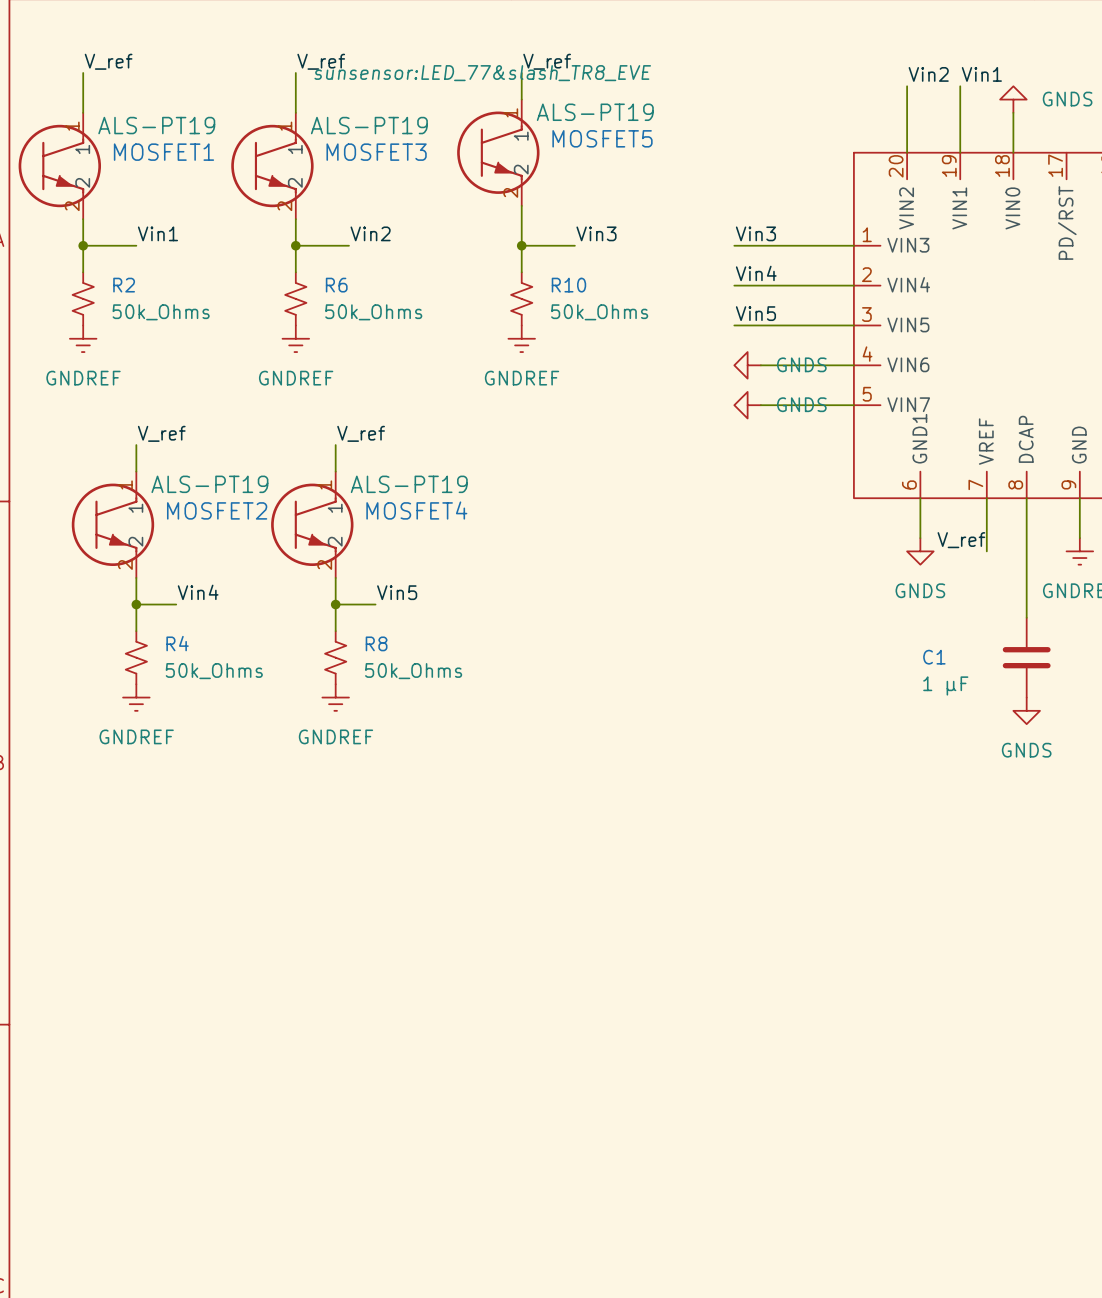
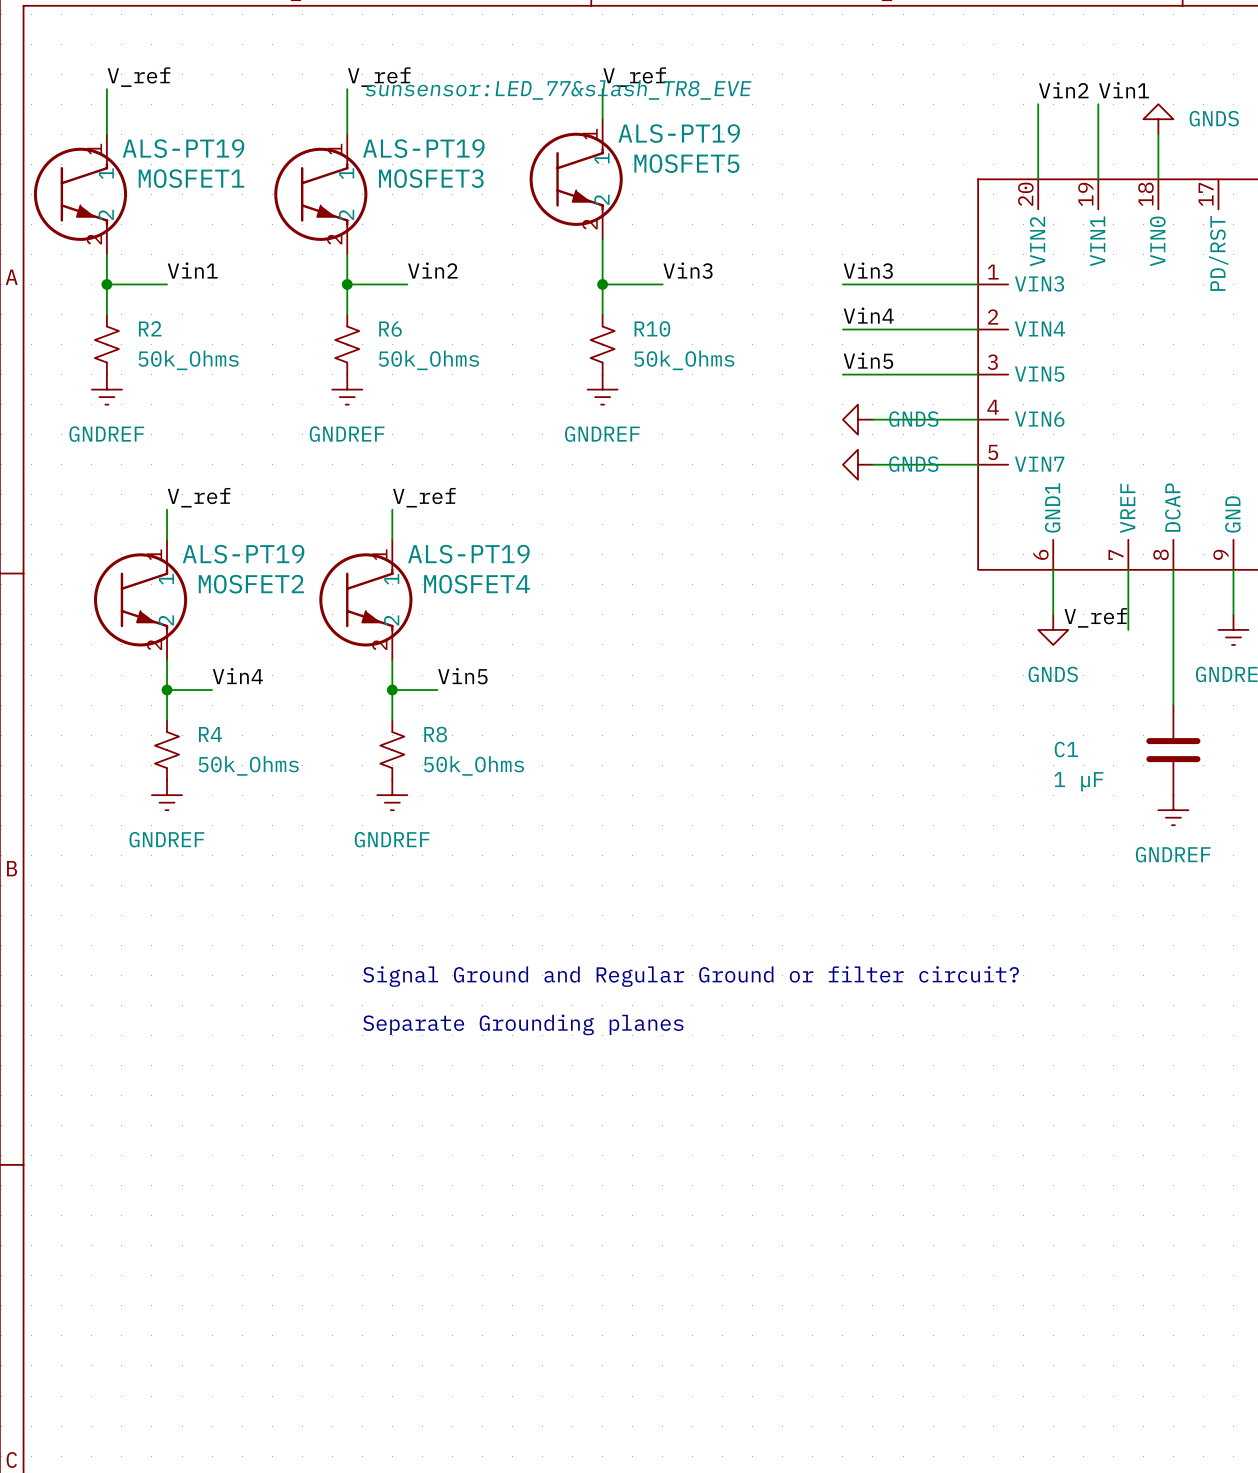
power symbol: GNDS (1026, 710) -> GNDREF (1173, 810)
text: none -> Signal Ground and Regular Ground or filter circuit? (691, 976)
text: none -> Separate Grounding planes (523, 1024)

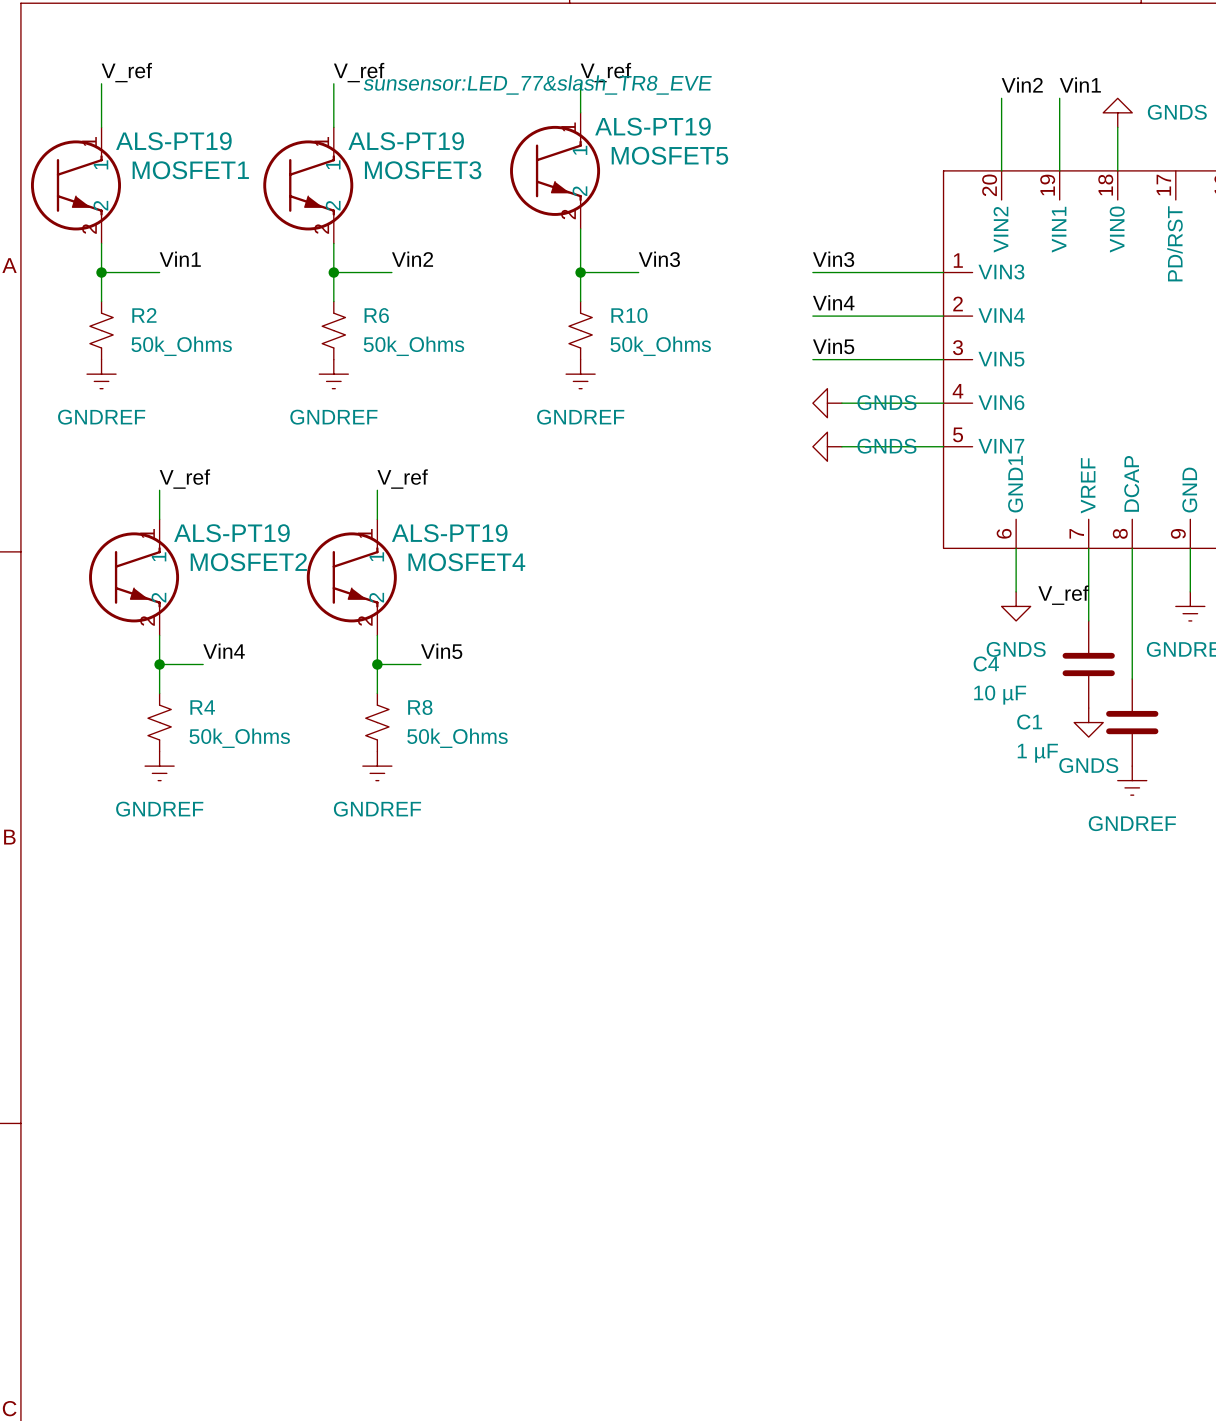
wire: none -> (1088, 606) (1088, 620)
C4: none -> 10 µF (1088, 664)
power symbol: none -> GNDS (1088, 722)
text: Signal Ground and Regular Ground or filter circuit? (691, 976) -> none
text: Separate Grounding planes (523, 1024) -> none

